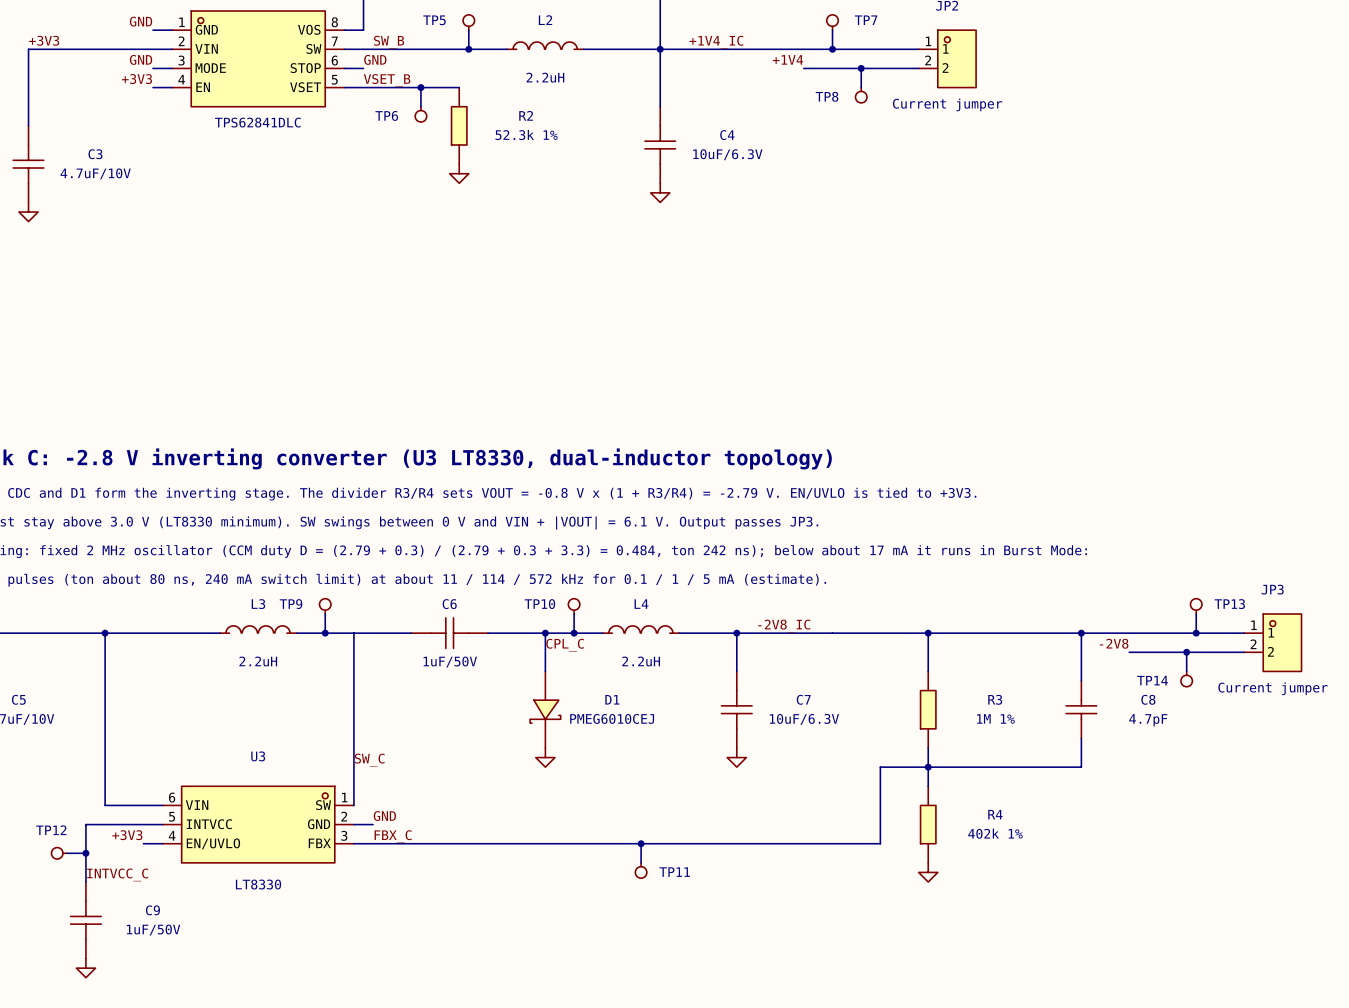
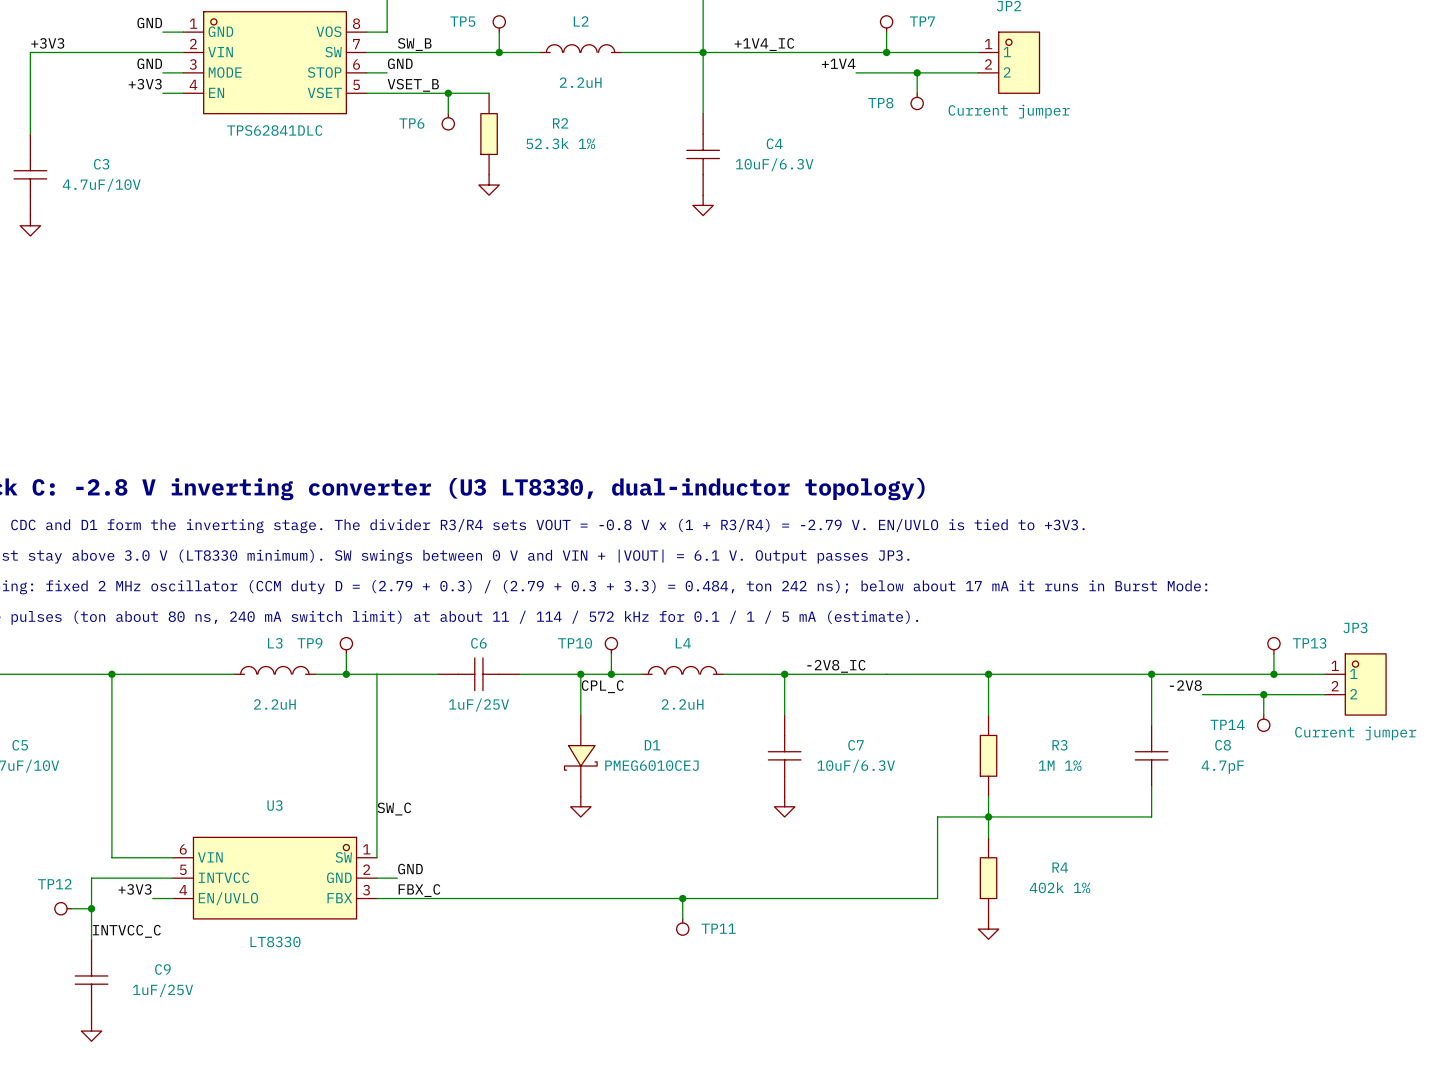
C6 value: 1uF/50V (450, 662) -> 1uF/25V (479, 705)
C9 value: 1uF/50V (153, 930) -> 1uF/25V (163, 990)

